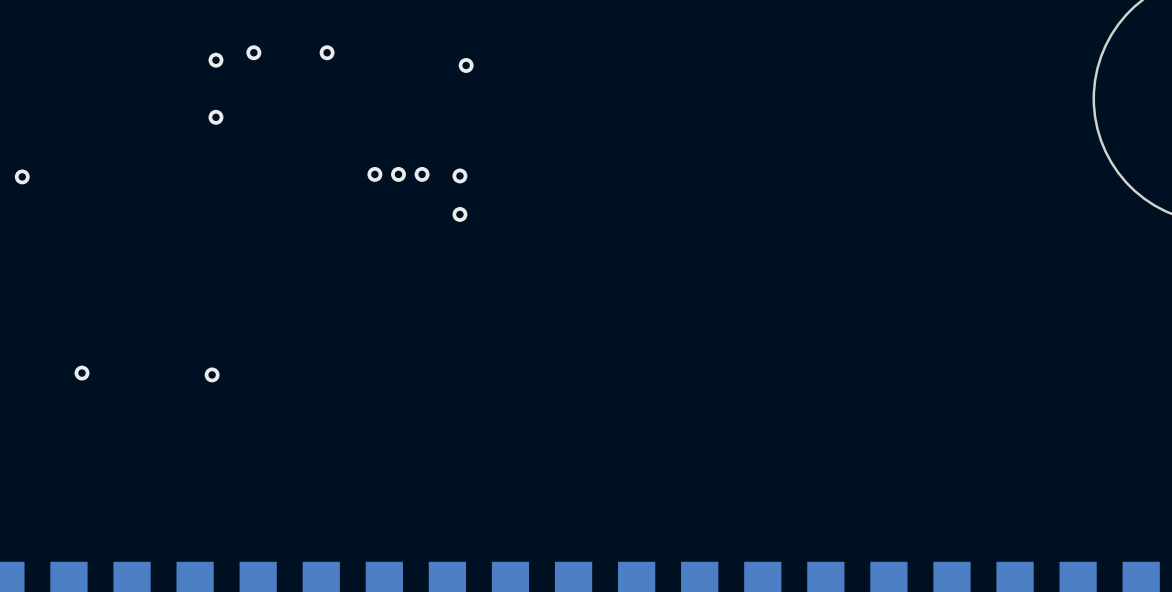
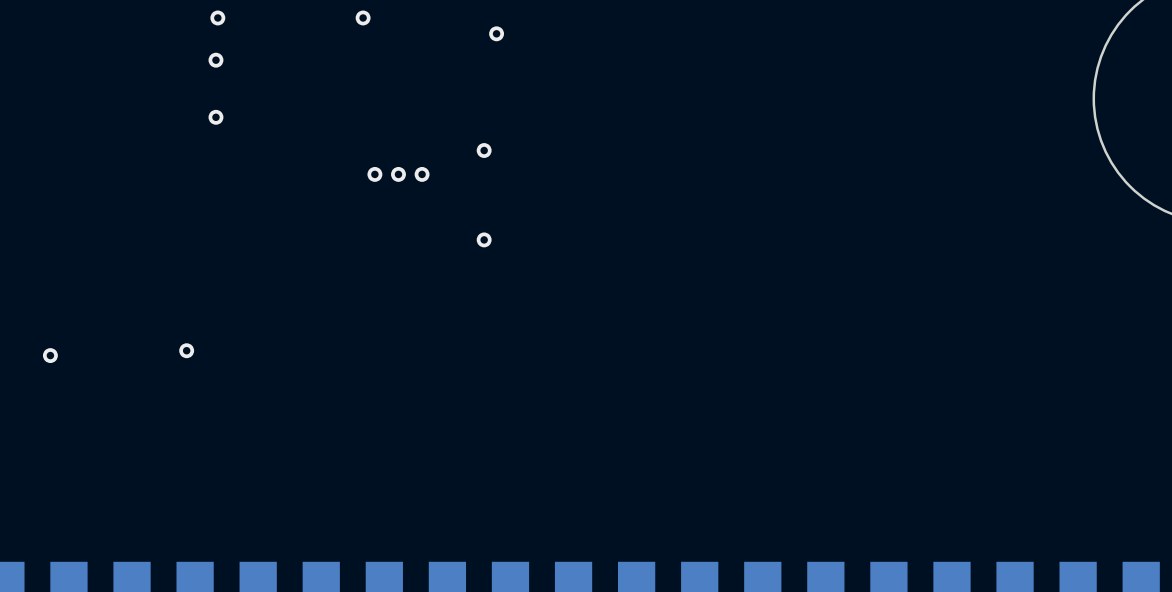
via: none -> (496, 33)
via position: (253, 52) -> (217, 17)
via position: (327, 52) -> (363, 17)
via: (466, 65) -> none
via: none -> (484, 150)
via: (459, 175) -> none
via: (22, 176) -> none
via: (459, 214) -> none
via: none -> (484, 239)
via position: (82, 373) -> (50, 355)
via position: (212, 374) -> (186, 350)

